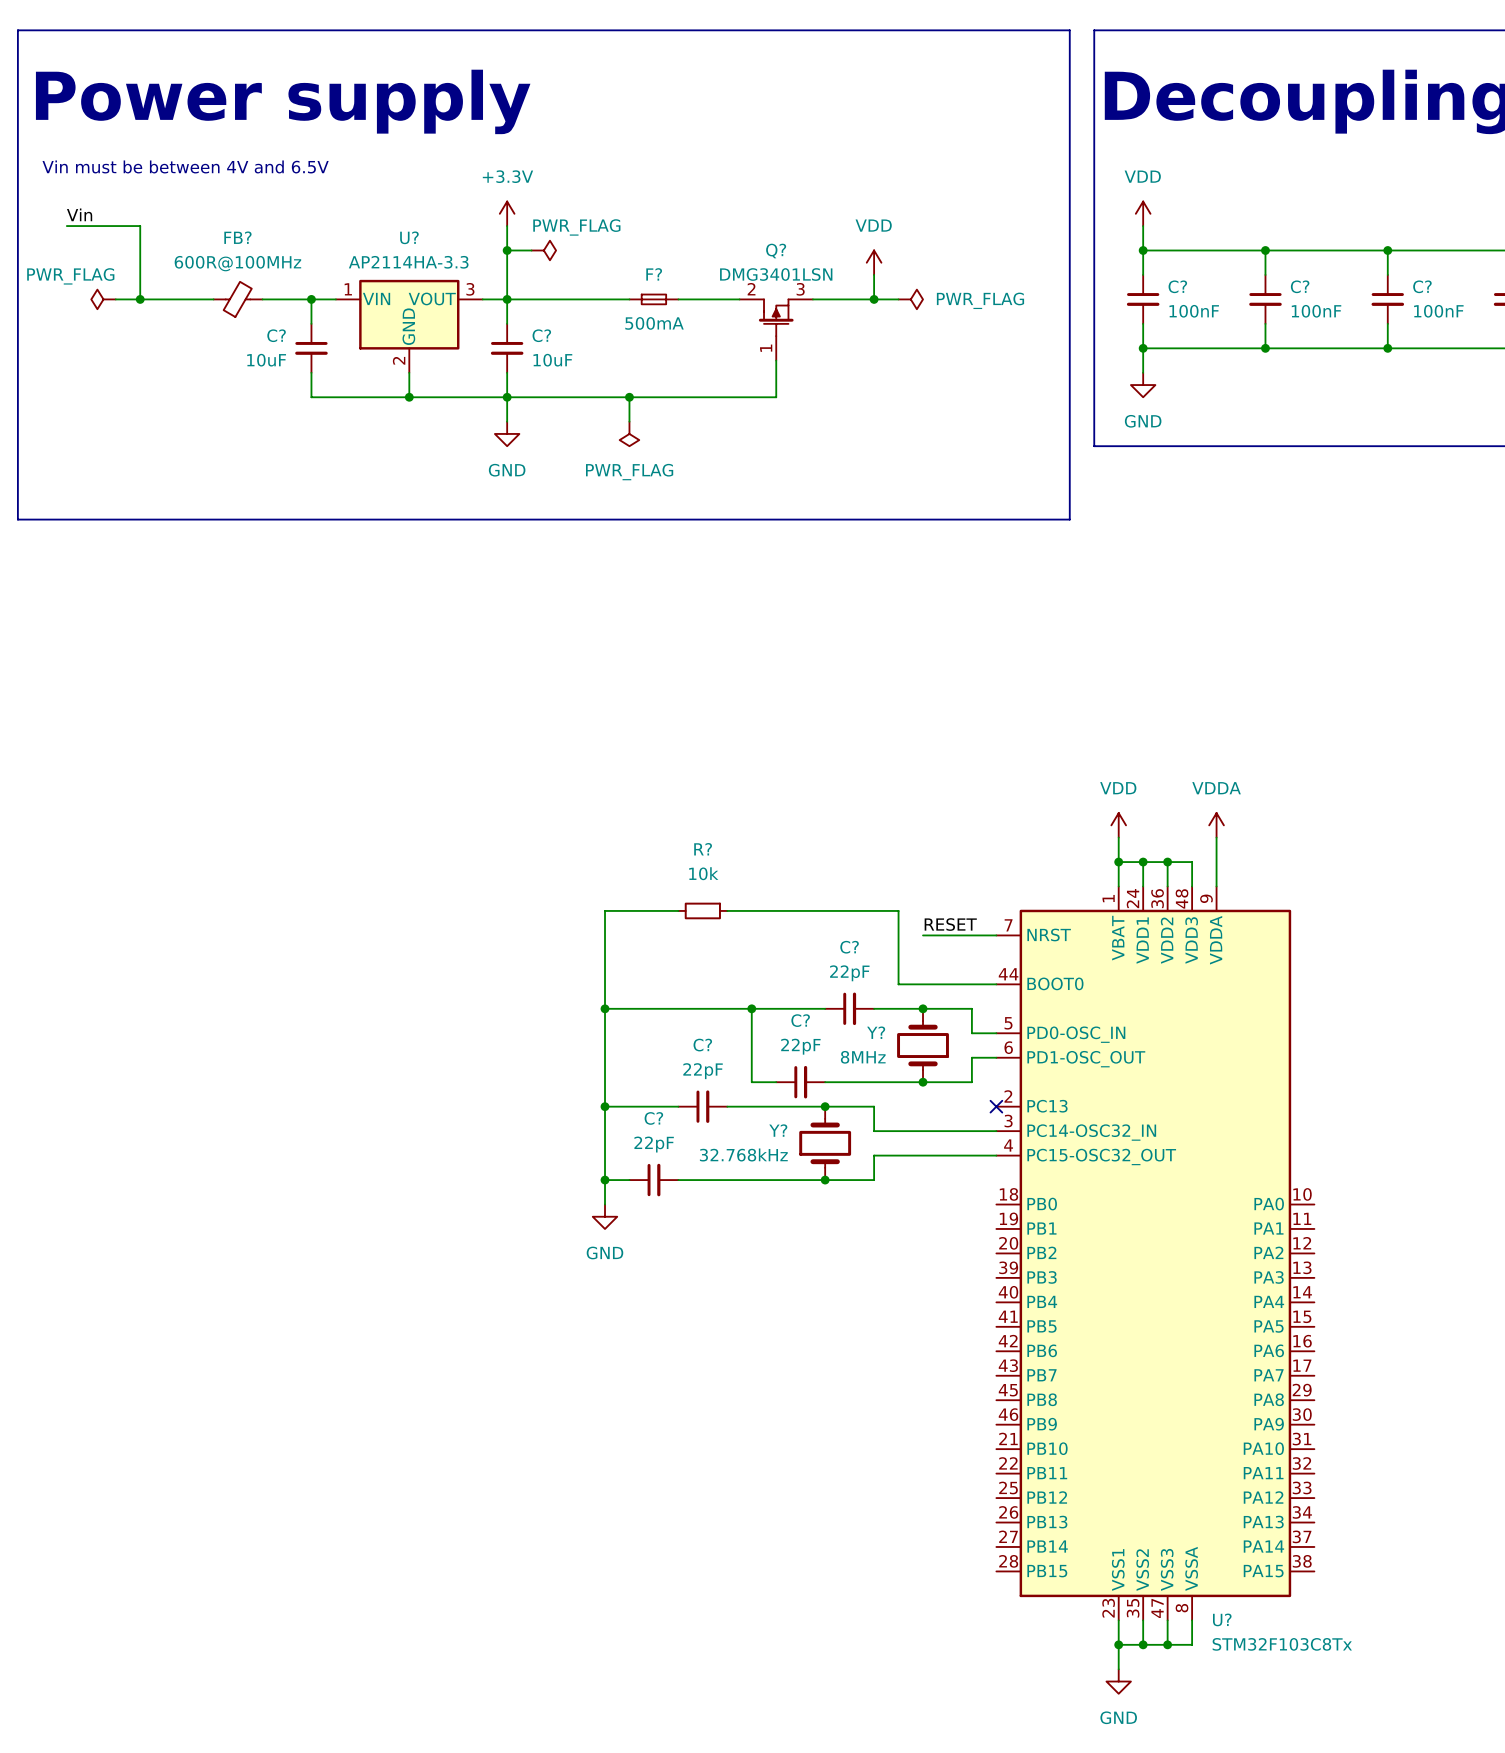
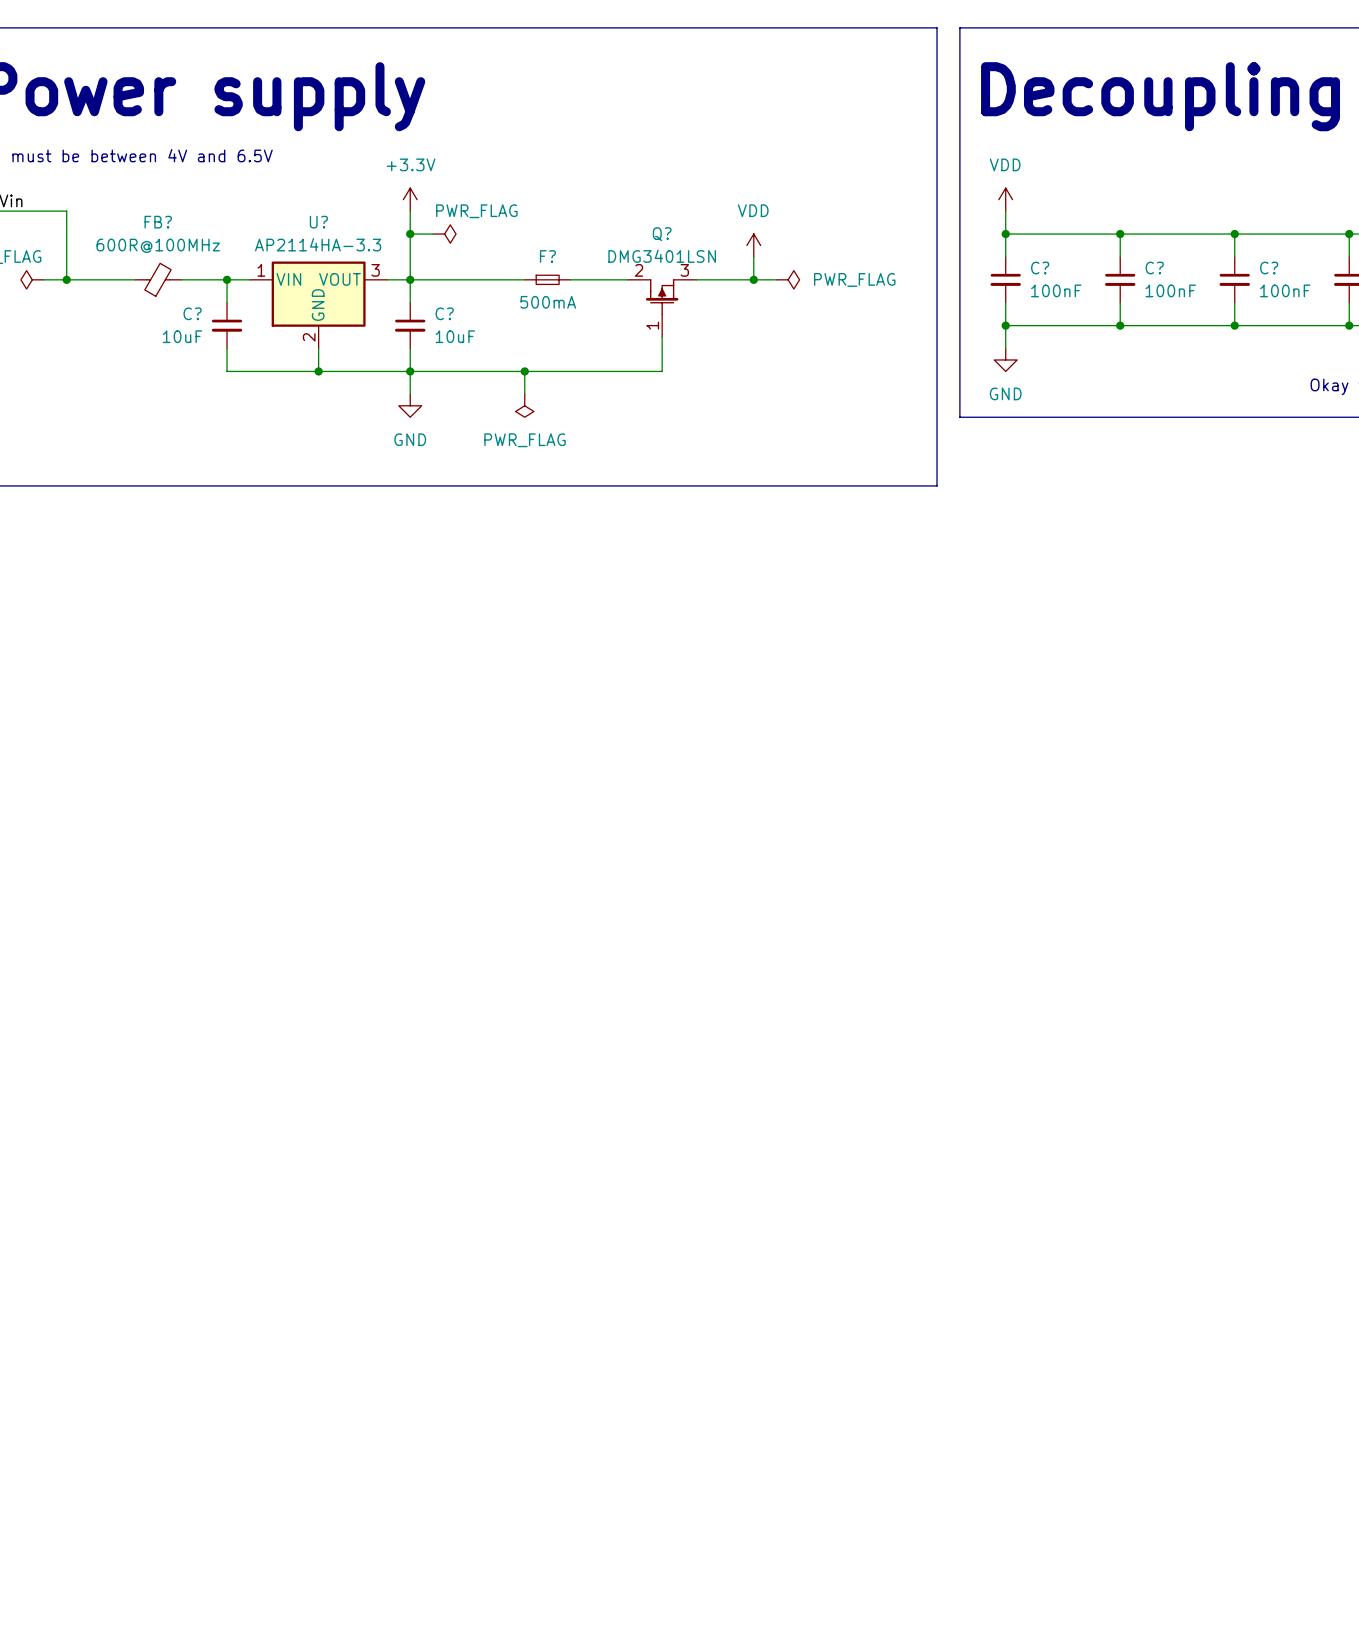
power symbol: VDD (1118, 825) -> none
power symbol: VDDA (1216, 825) -> none
wire: (1118, 837) (1118, 886) -> none
wire: (1216, 837) (1216, 886) -> none
wire: (1118, 862) (1192, 862) (1192, 886) -> none
junction: (1118, 862) -> none
wire: (1143, 862) (1143, 886) -> none
junction: (1143, 862) -> none
wire: (1167, 862) (1167, 886) -> none
junction: (1167, 862) -> none
wire: (678, 910) (605, 910) (605, 1204) -> none
R?: 10k (702, 910) -> none
wire: (727, 910) (898, 910) (898, 984) (996, 984) -> none
label: RESET (950, 924) -> none
wire: (923, 935) (996, 935) -> none
wire: (605, 1008) (825, 1008) -> none
junction: (605, 1008) -> none
wire: (751, 1008) (751, 1082) (776, 1082) -> none
junction: (751, 1008) -> none
C?: 22pF (849, 1008) -> none
wire: (874, 1008) (971, 1008) (971, 1033) (996, 1033) -> none
junction: (923, 1008) -> none
Y?: 8MHz (923, 1045) -> none
wire: (996, 1057) (971, 1057) (971, 1082) (825, 1082) -> none
C?: 22pF (800, 1082) -> none
junction: (923, 1082) -> none
wire: (605, 1106) (678, 1106) -> none
junction: (605, 1106) -> none
C?: 22pF (702, 1106) -> none
wire: (727, 1106) (874, 1106) (874, 1131) (996, 1131) -> none
junction: (825, 1106) -> none
no-connect mark: (996, 1106) -> none
Y?: 32.768kHz (825, 1143) -> none
wire: (996, 1155) (874, 1155) (874, 1180) (678, 1180) -> none
wire: (605, 1180) (629, 1180) -> none
junction: (605, 1180) -> none
C?: 22pF (653, 1180) -> none
junction: (825, 1180) -> none
power symbol: GND (605, 1216) -> none
U?: STM32F103C8Tx (1155, 1253) -> none
wire: (1118, 1620) (1118, 1669) -> none
wire: (1143, 1620) (1143, 1644) -> none
wire: (1167, 1620) (1167, 1644) -> none
wire: (1192, 1620) (1192, 1644) (1118, 1644) -> none
junction: (1118, 1644) -> none
junction: (1143, 1644) -> none
junction: (1167, 1644) -> none
power symbol: GND (1118, 1681) -> none

